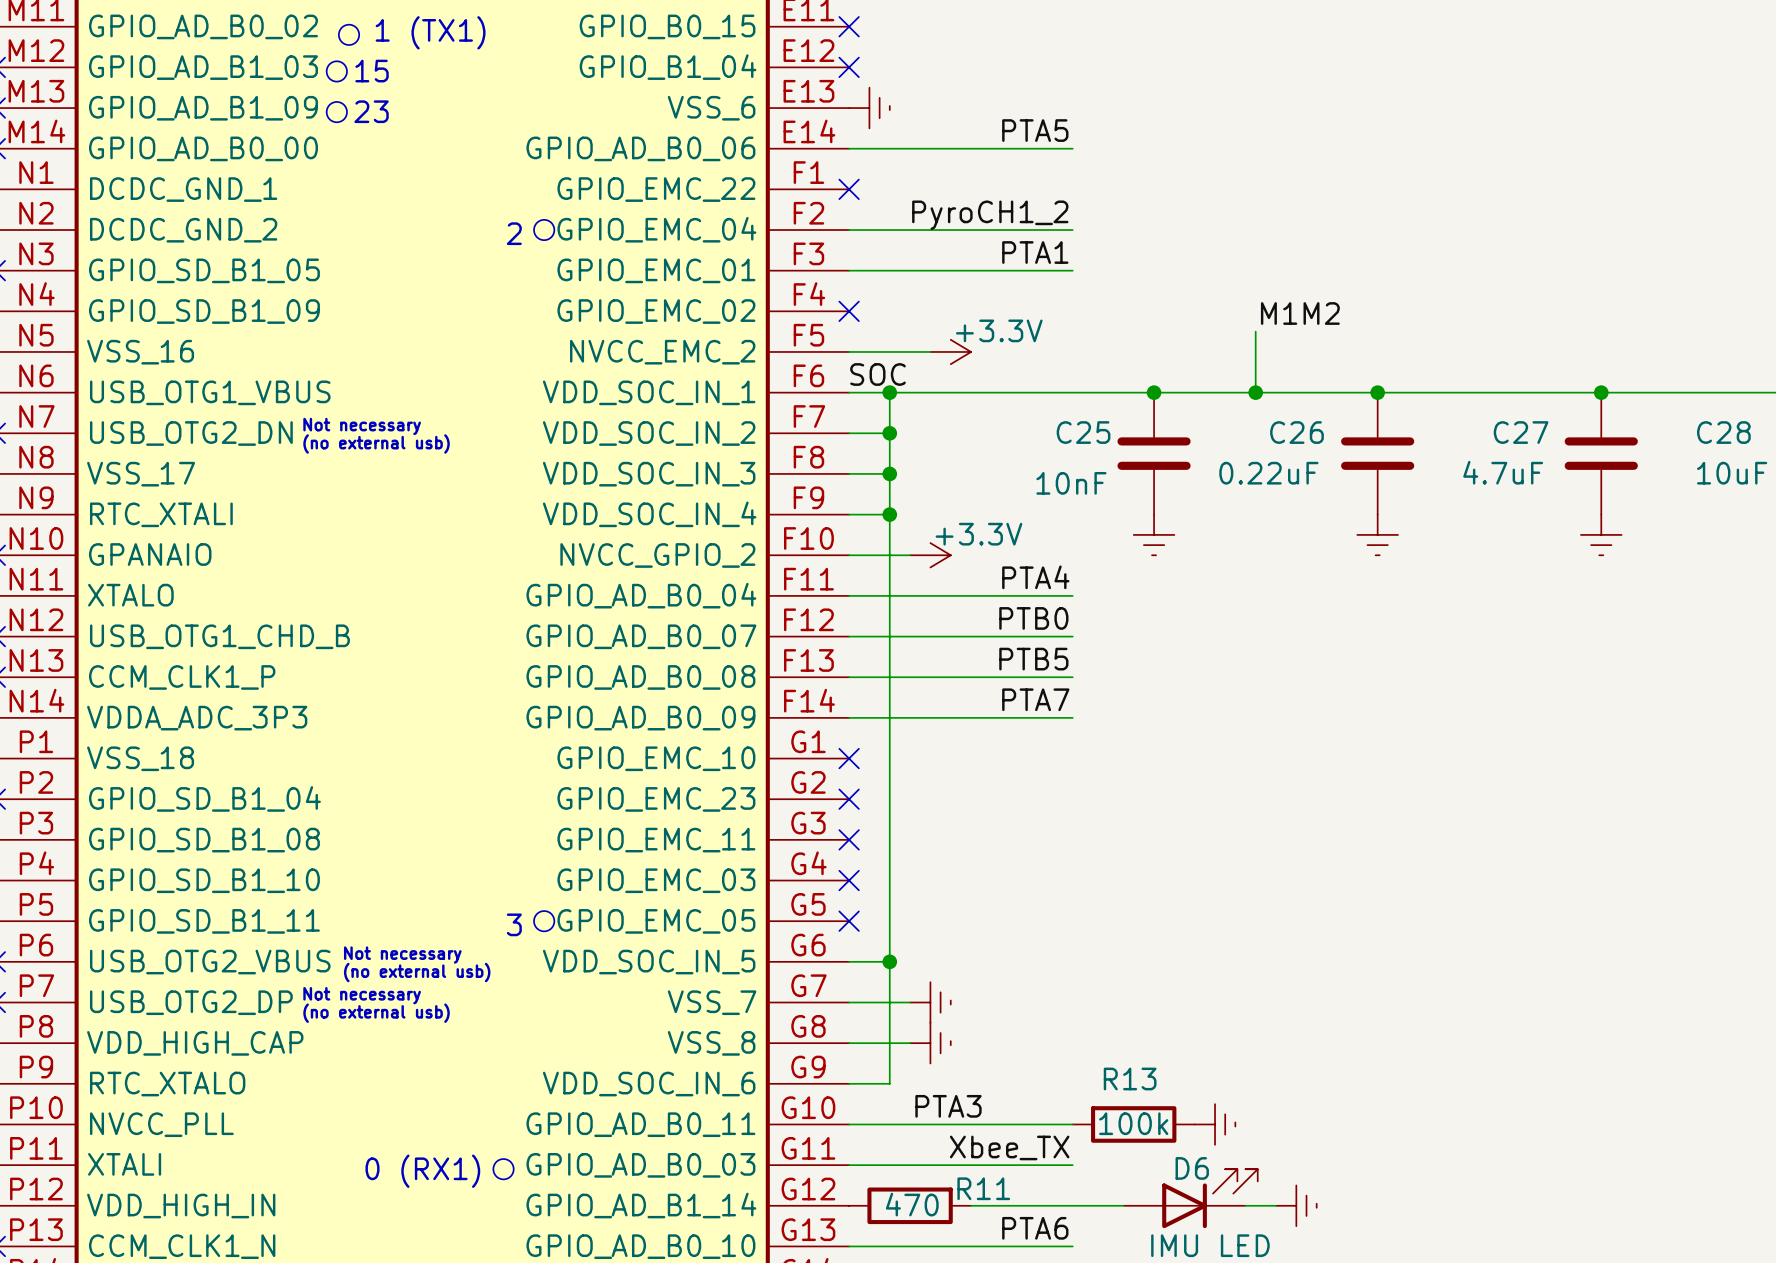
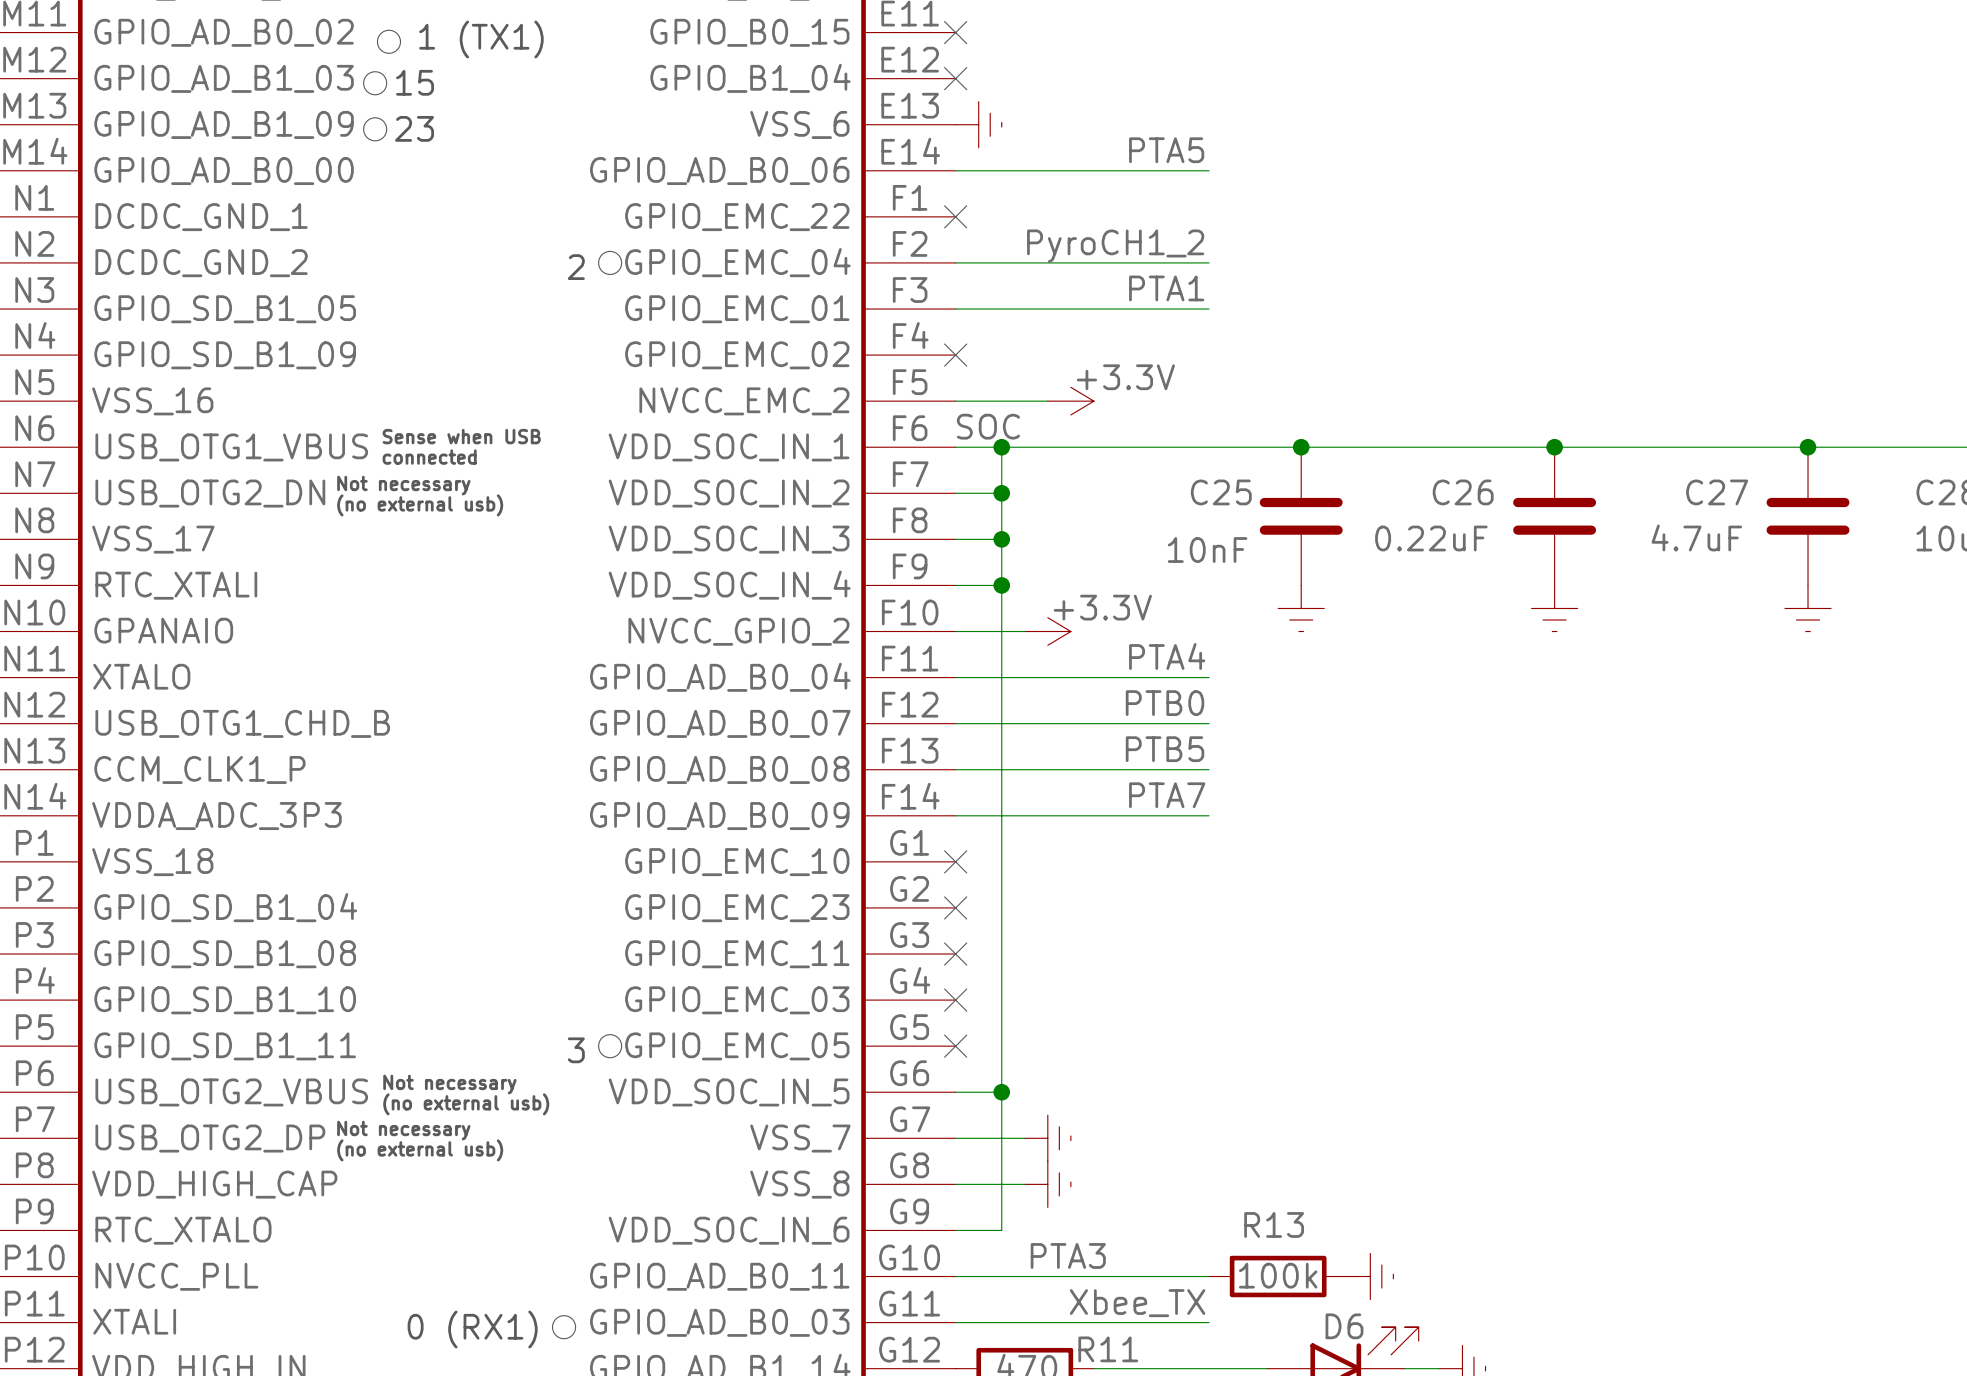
label: M1M2 (1300, 313) -> none
wire: (1255, 331) (1255, 392) -> none
text: none -> Sense when USB (461, 436)
junction: (1255, 392) -> none
text: none -> connected (429, 457)

